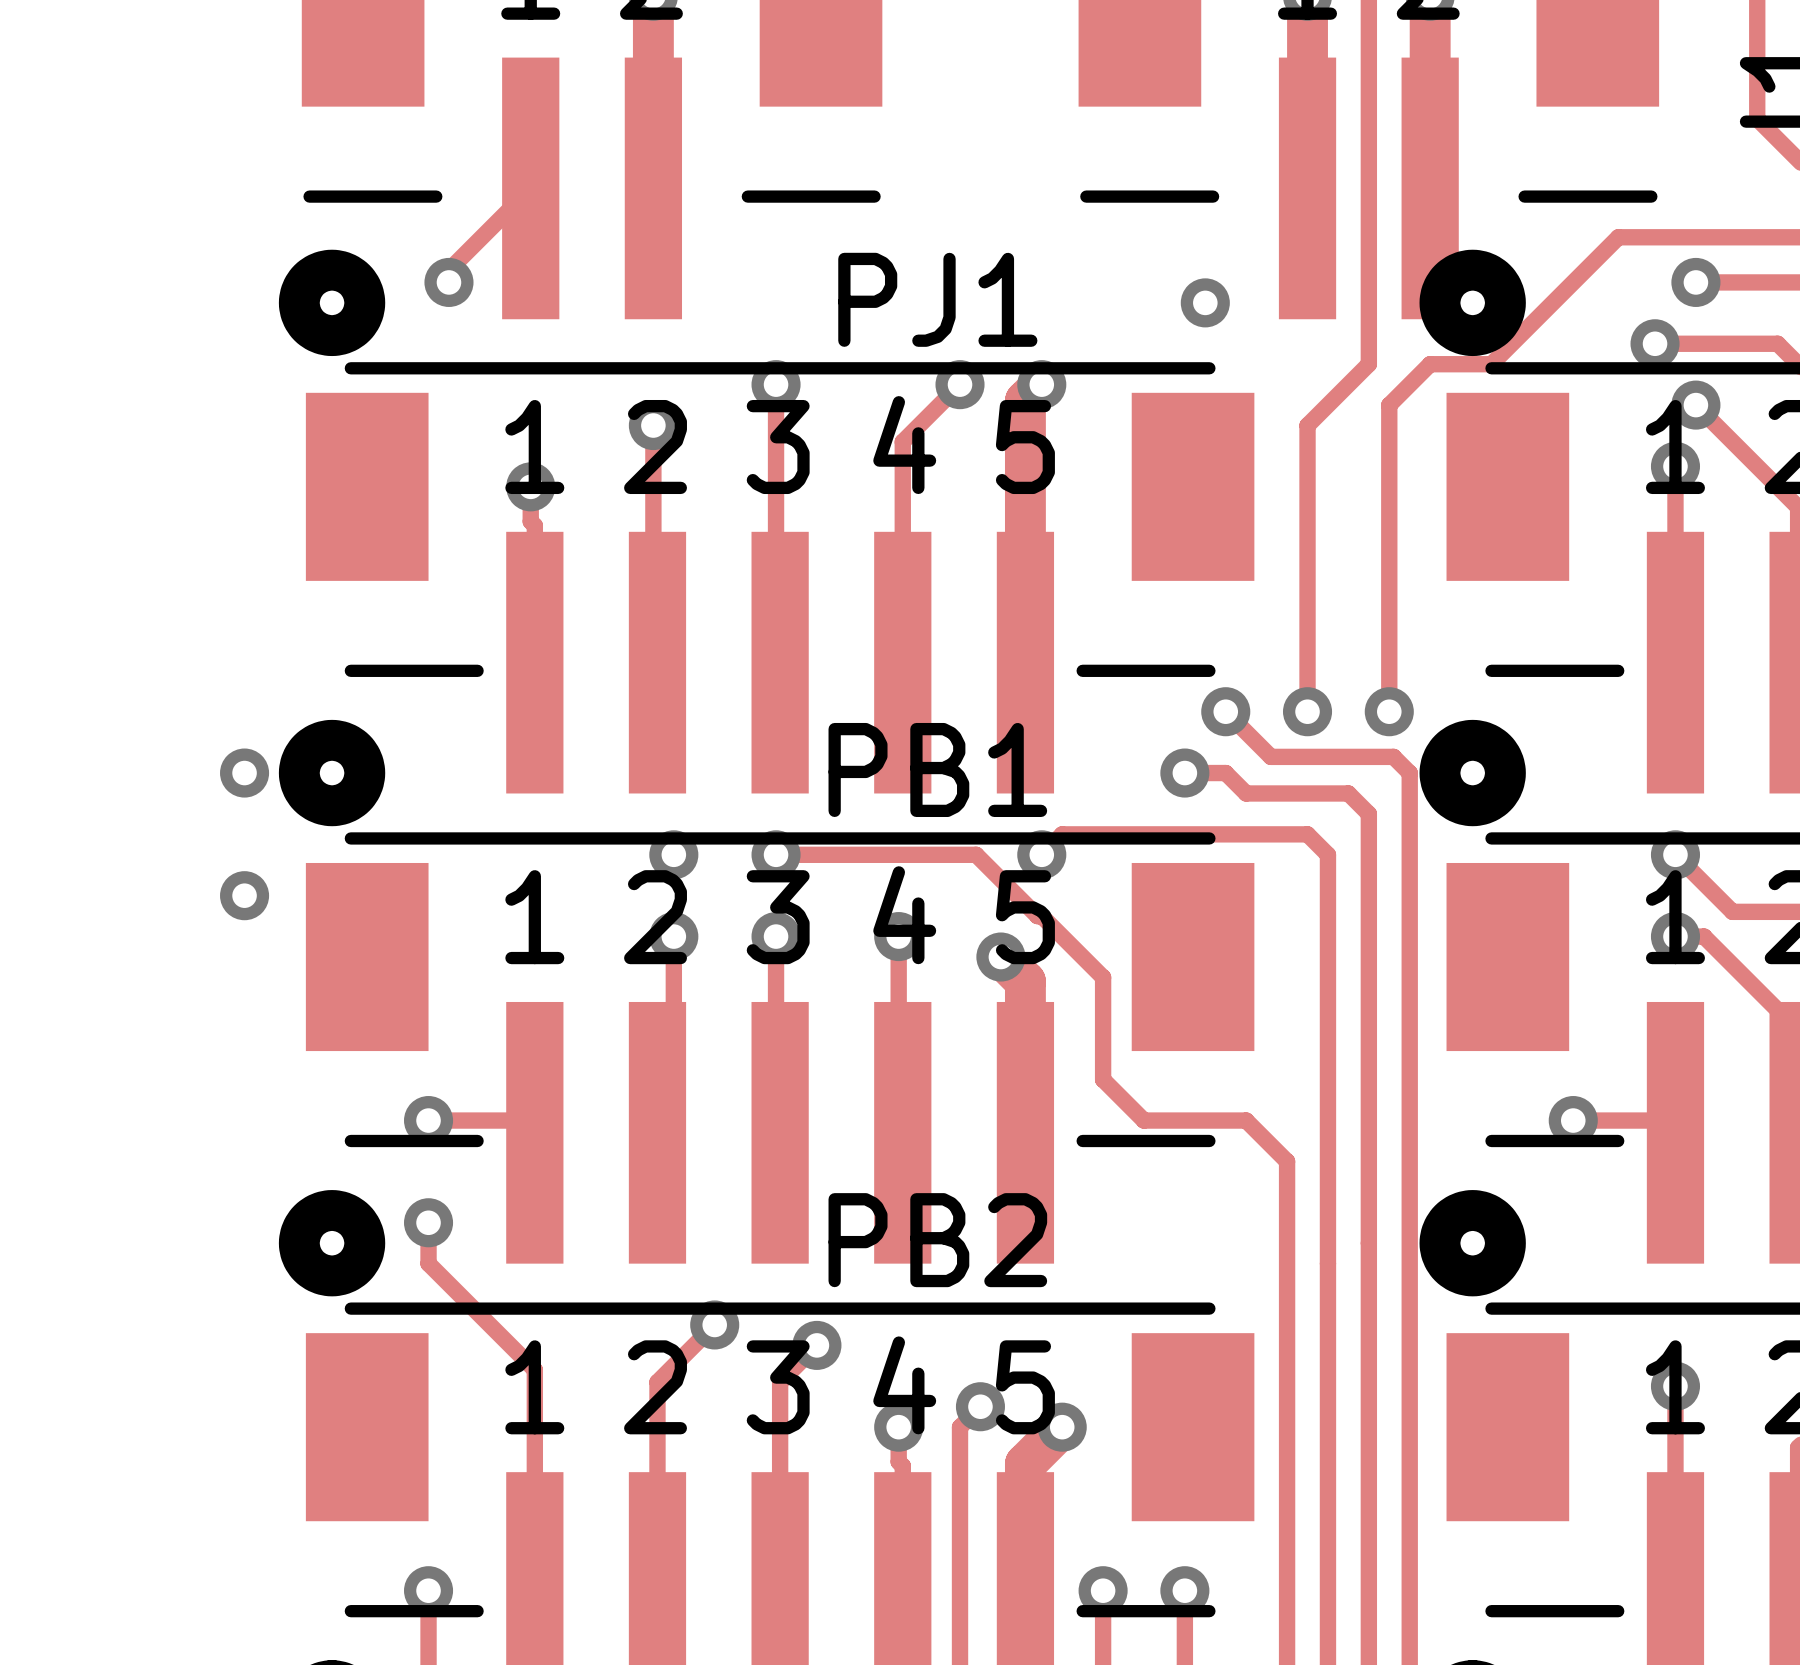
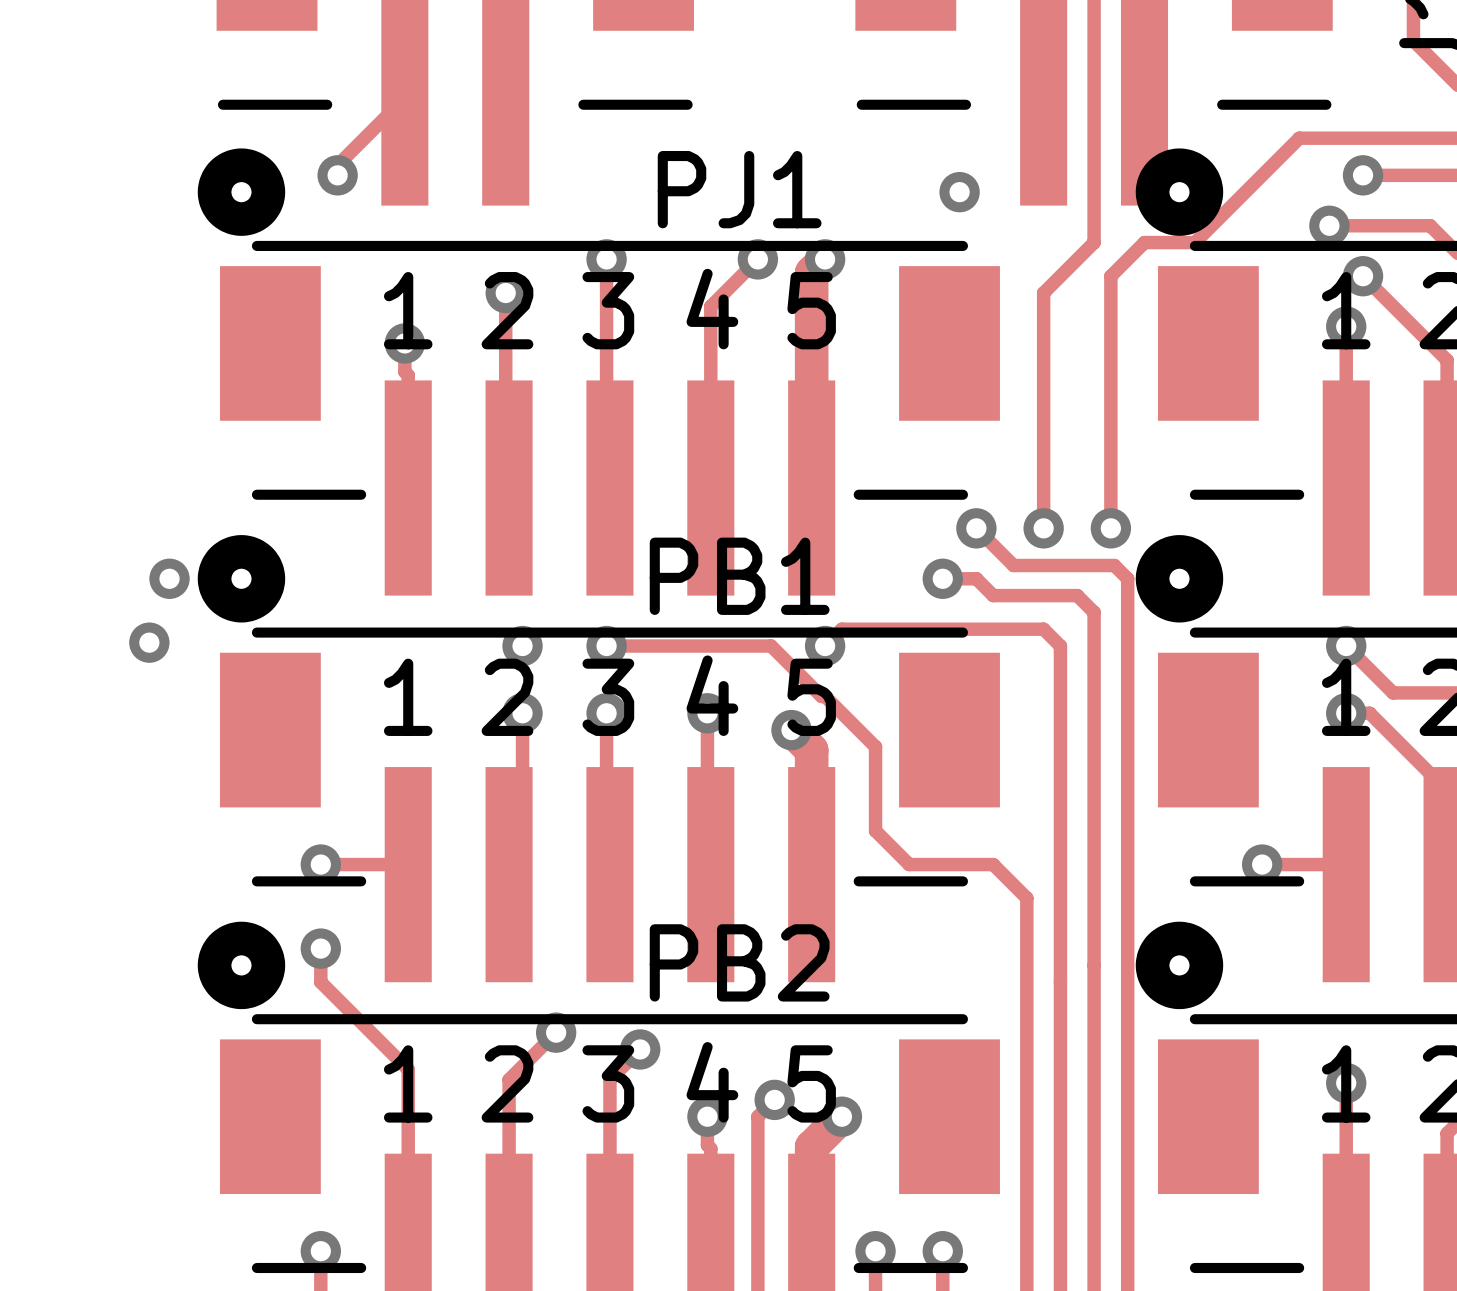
via position: (244, 895) -> (149, 642)

